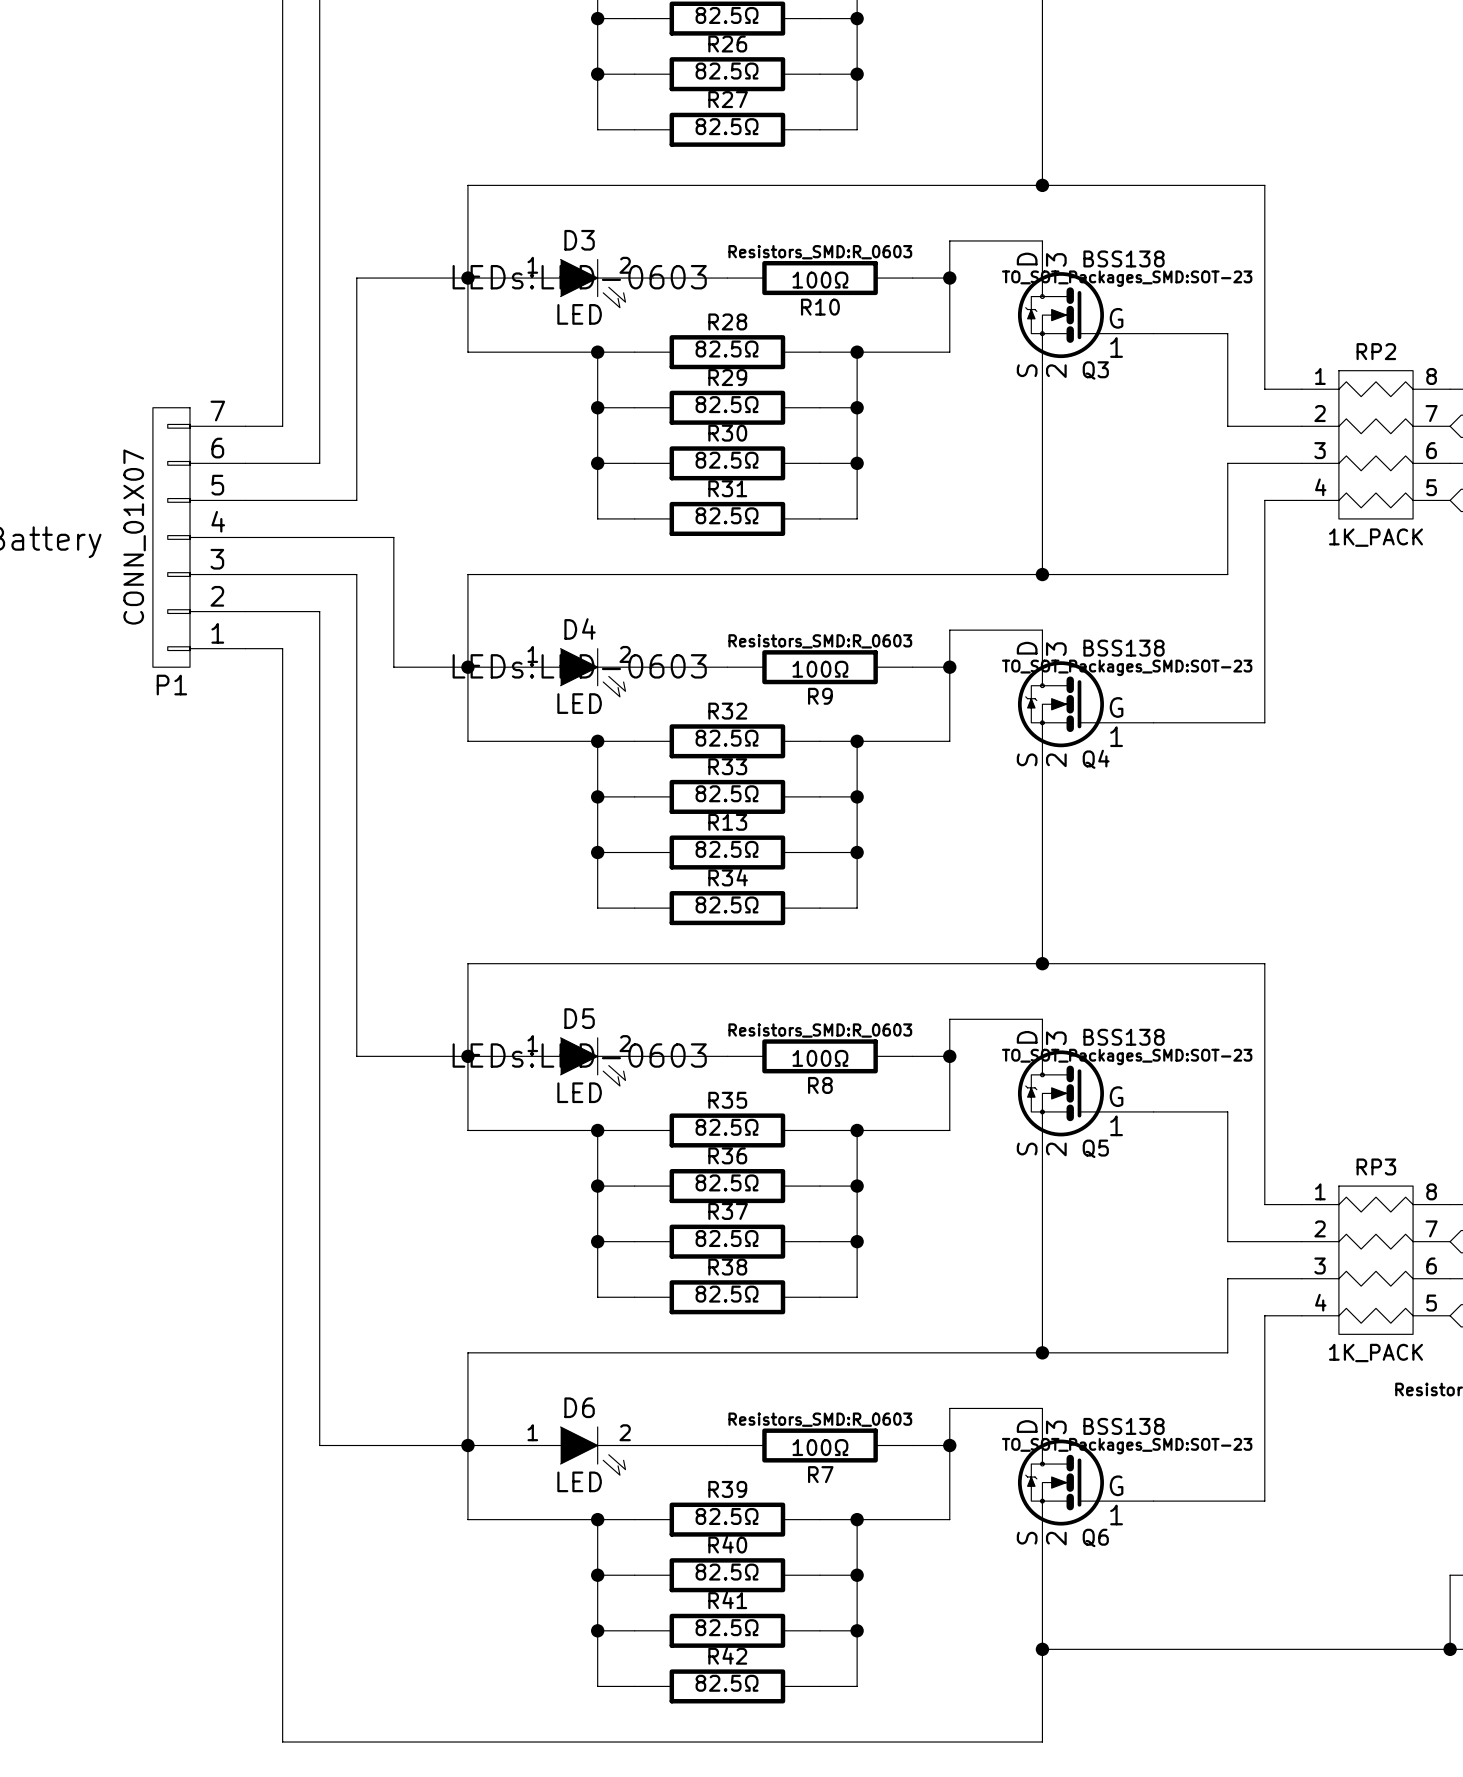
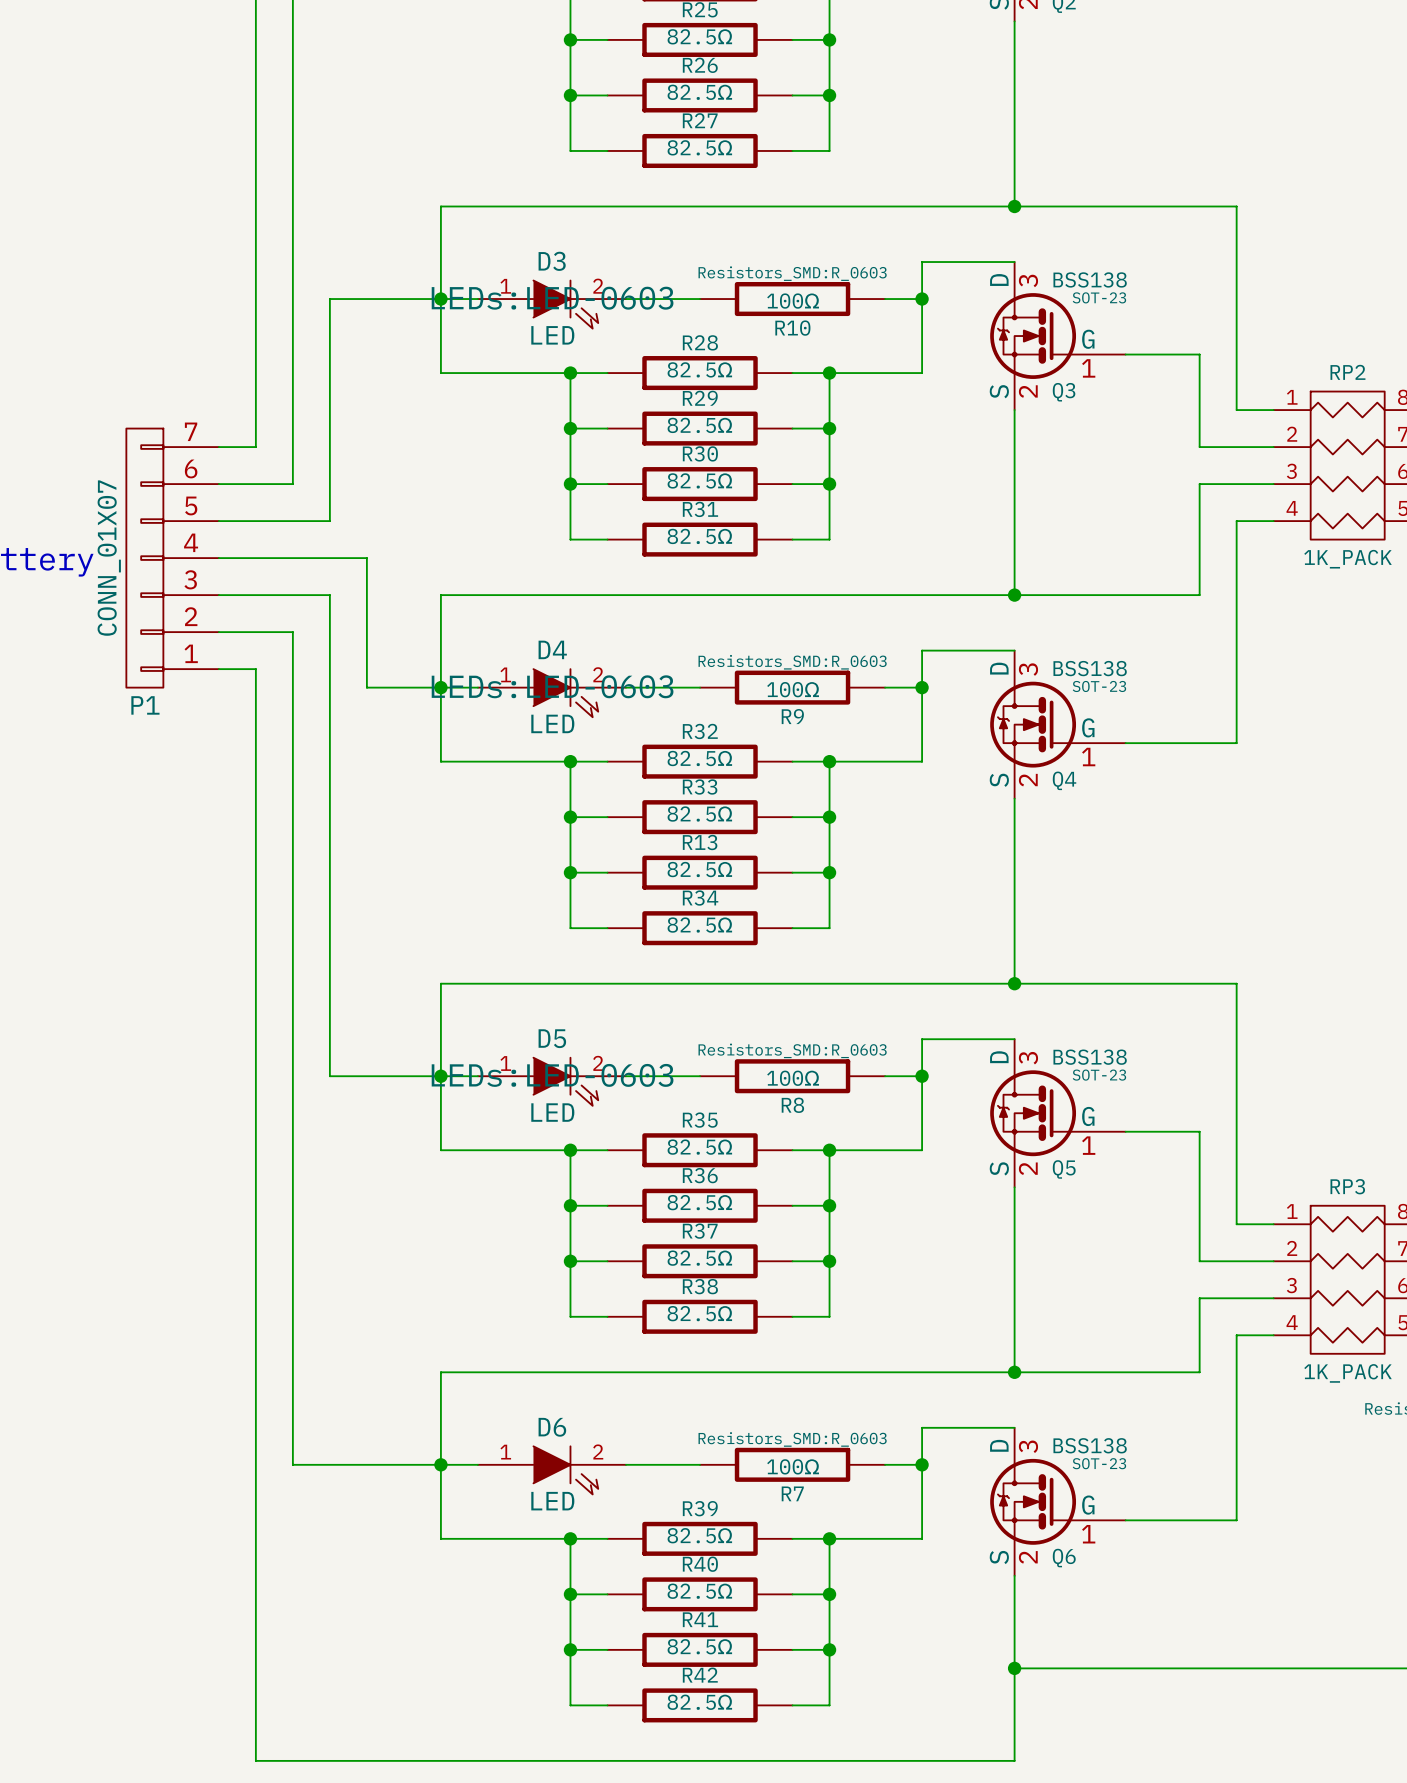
Q3 text: TO_SOT_Packages_SMD:SOT-23 (1127, 278) -> SOT-23 (1099, 297)
Q4 text: TO_SOT_Packages_SMD:SOT-23 (1127, 667) -> SOT-23 (1099, 686)
Q5 text: TO_SOT_Packages_SMD:SOT-23 (1127, 1057) -> SOT-23 (1099, 1075)
Q6 text: TO_SOT_Packages_SMD:SOT-23 (1127, 1446) -> SOT-23 (1099, 1463)

